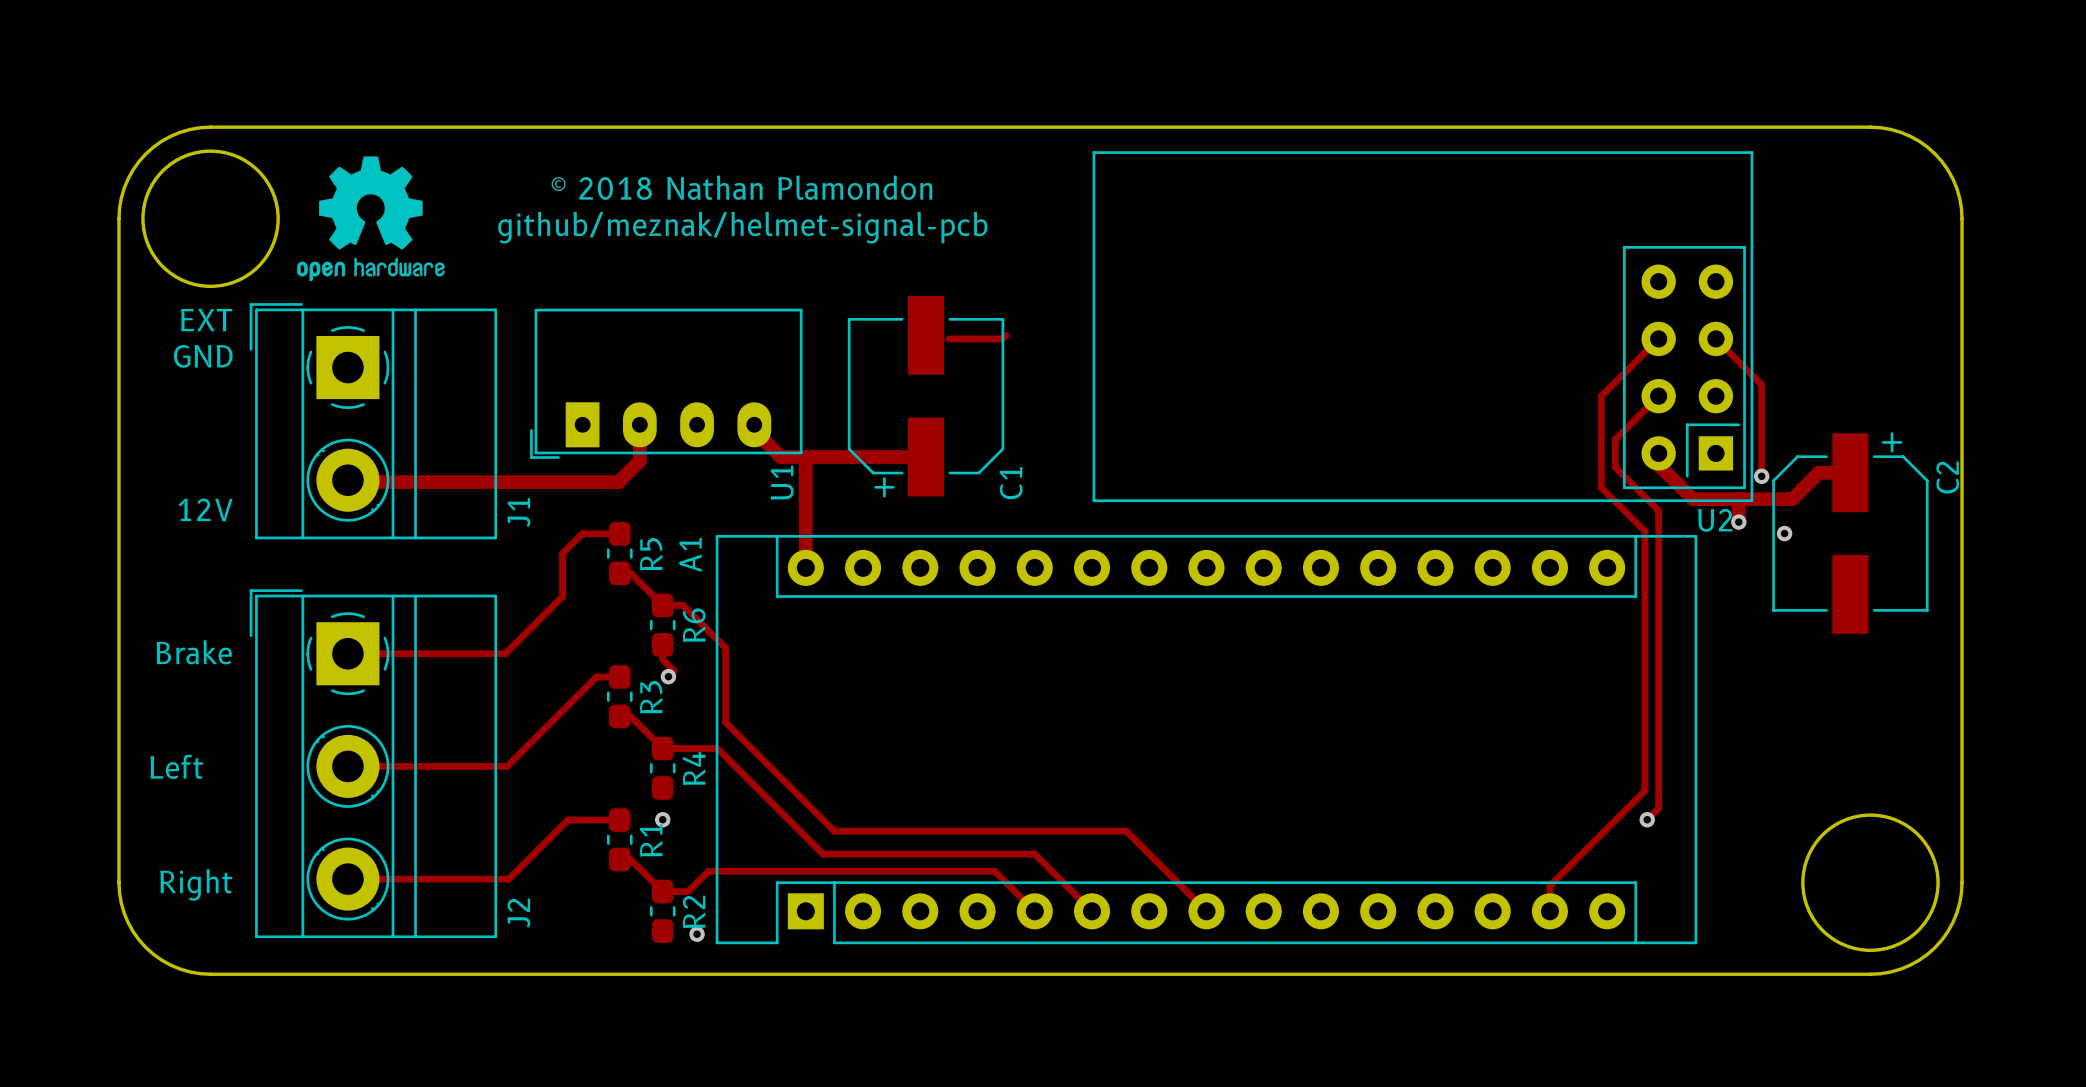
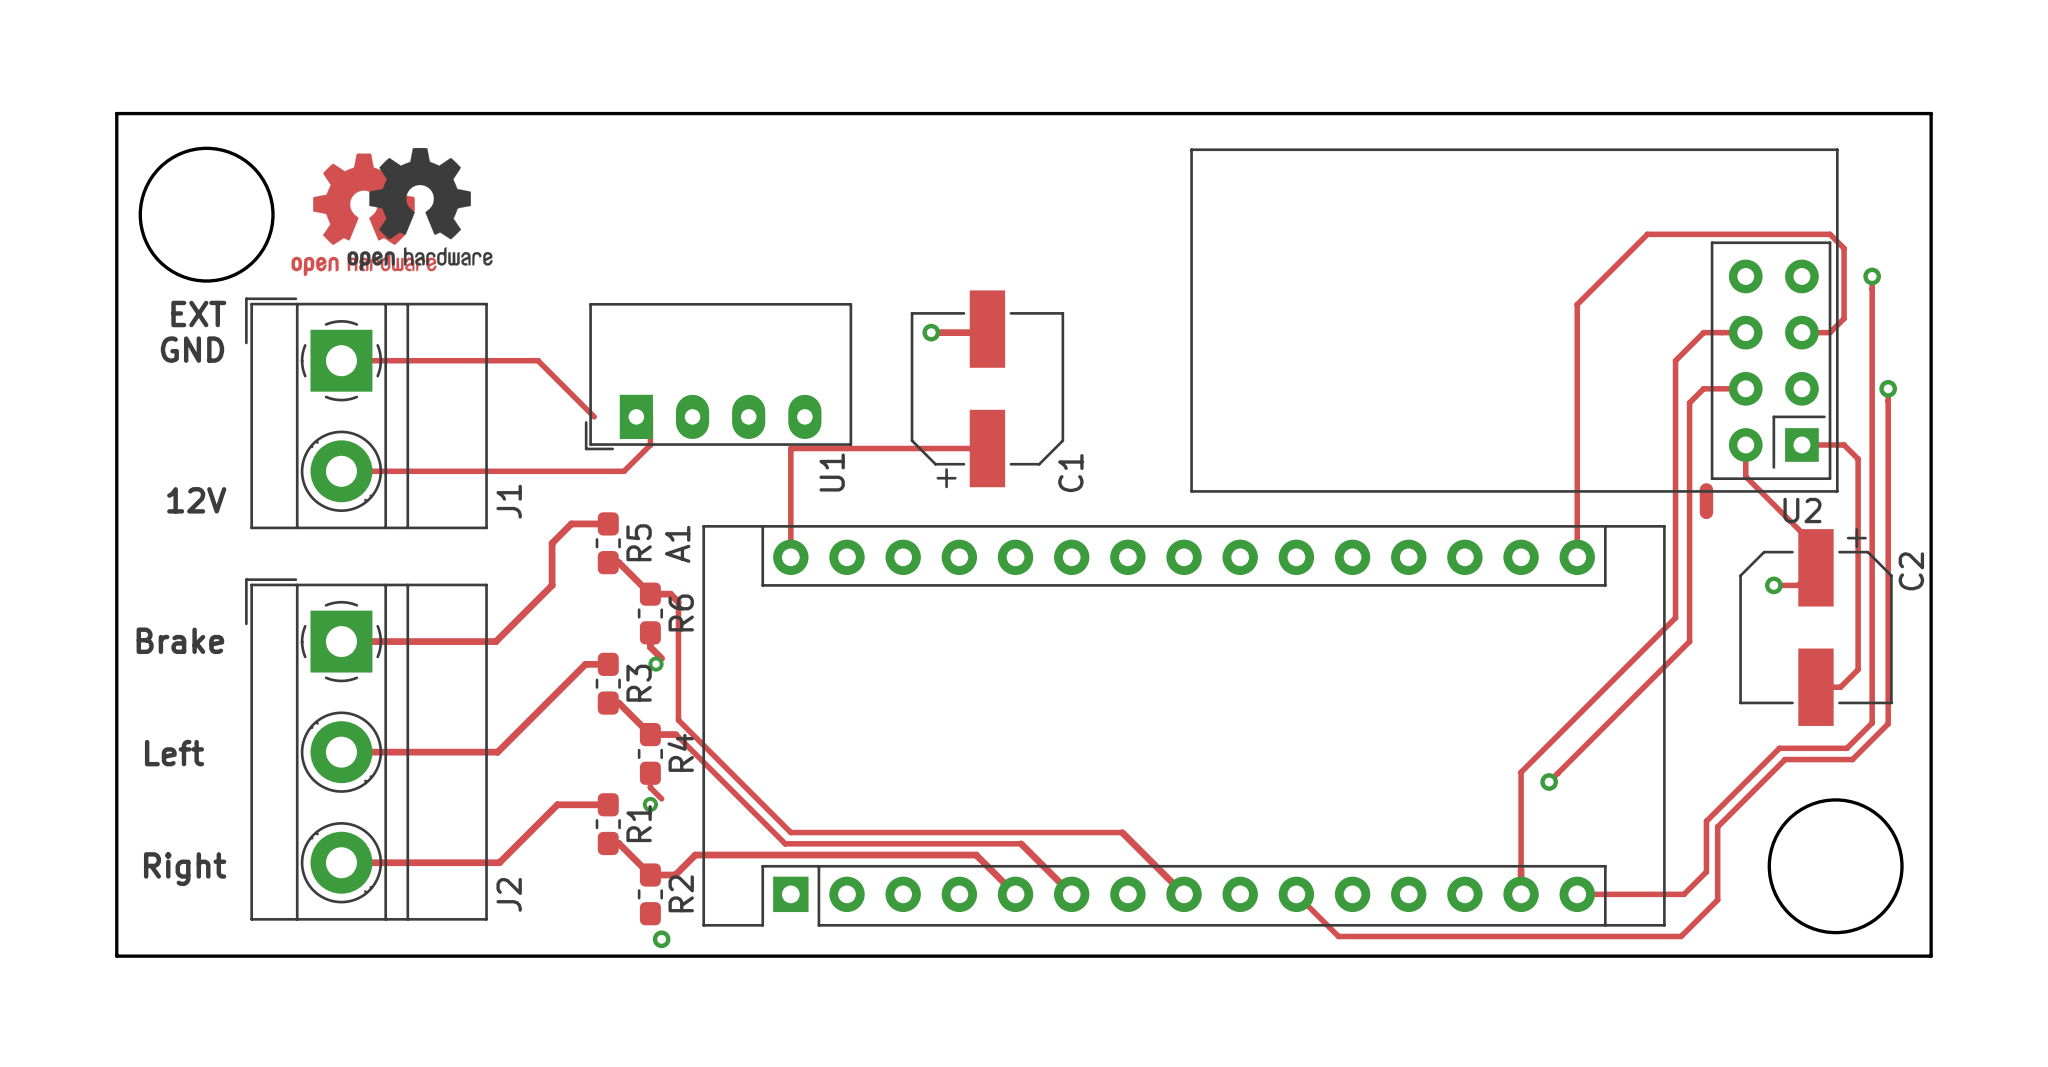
text: © 2018 Nathan Plamondon (741, 187) -> none
board edge: (118, 218) (121, 198) (128, 179) (145, 153) (170, 136) (190, 129) (210, 127) (1870, 127) (1890, 129) (1910, 136) (1927, 147) (1942, 161) (1956, 188) (1961, 208) (1962, 882) (1956, 912) (1947, 931) (1935, 947) (1919, 960) (1900, 969) (1870, 974) -> (116, 214) (116, 113) (1931, 113) (1931, 956) (1835, 956)
drawing position: (370, 218) -> (420, 209)
text: github/meznak/helmet-signal-pcb (742, 227) -> none
track: none -> (1872, 276) (1872, 723) (1846, 748) (1779, 748) (1706, 821) (1706, 871) (1683, 894) (1577, 894)
via: none -> (1872, 276)
U2 position: (1422, 326) -> (1514, 320)
via: none -> (931, 332)
track: (1658, 338) (1601, 396) (1601, 487) (1644, 531) (1644, 790) (1549, 885) -> (1745, 332) (1703, 332) (1675, 360) (1675, 617) (1521, 772) (1521, 869)
track: (1715, 338) (1761, 384) (1761, 476) -> none
track: none -> (1801, 332) (1830, 332) (1844, 318) (1844, 248) (1830, 234) (1647, 234) (1577, 304) (1577, 557)
track: none -> (341, 360) (538, 360) (594, 416)
U1 position: (666, 383) -> (718, 376)
C1 position: (926, 396) -> (987, 389)
track: (1658, 396) (1615, 439) (1615, 467) (1658, 510) (1658, 808) (1647, 819) -> none
track: none -> (1745, 388) (1703, 388) (1689, 402) (1689, 641) (1549, 782)
track: none -> (1888, 388) (1888, 723) (1852, 759) (1785, 759) (1717, 826) (1717, 899) (1681, 936) (1338, 936) (1296, 894)
via: none -> (1888, 388)
track: (639, 424) (639, 461) (618, 482) (349, 482) (347, 480) -> (650, 416) (650, 444) (624, 471) (341, 471)
track: (754, 424) (754, 430) (780, 457) (805, 457) -> none
track: (1658, 453) (1658, 464) (1693, 499) (1792, 499) (1818, 472) (1850, 472) -> none
track: none -> (1745, 444) (1745, 476) (1815, 546) (1815, 567) (1798, 585) (1773, 585)
track: none -> (1801, 444) (1844, 444) (1858, 459) (1858, 669) (1840, 687) (1830, 687)
track: none -> (908, 448) (987, 448)
track width: thick (926, 457) (805, 457) (805, 567) -> thin (908, 448) (790, 448) (790, 557)
via: (1761, 476) -> none
via: (1738, 522) -> none
via: (1784, 533) -> none
C2 position: (1850, 533) -> (1815, 627)
via: none -> (1773, 585)
track: (691, 613) (725, 648) (725, 722) (834, 831) (1126, 831) (1143, 848) -> (678, 602) (678, 720) (790, 832) (1122, 832)
track: (688, 748) (717, 748) (823, 854) (1034, 854) (1040, 859) -> (675, 734) (785, 843) (1021, 843)
track: none -> (650, 773) (650, 787) (661, 798)
via: none -> (1549, 782)
via: (1647, 819) -> none
board edge: (118, 882) (121, 903) (128, 922) (145, 947) (170, 965) (190, 971) (210, 974) -> (116, 866) (116, 956) (206, 956)
via: (697, 934) -> none
via: none -> (661, 939)

